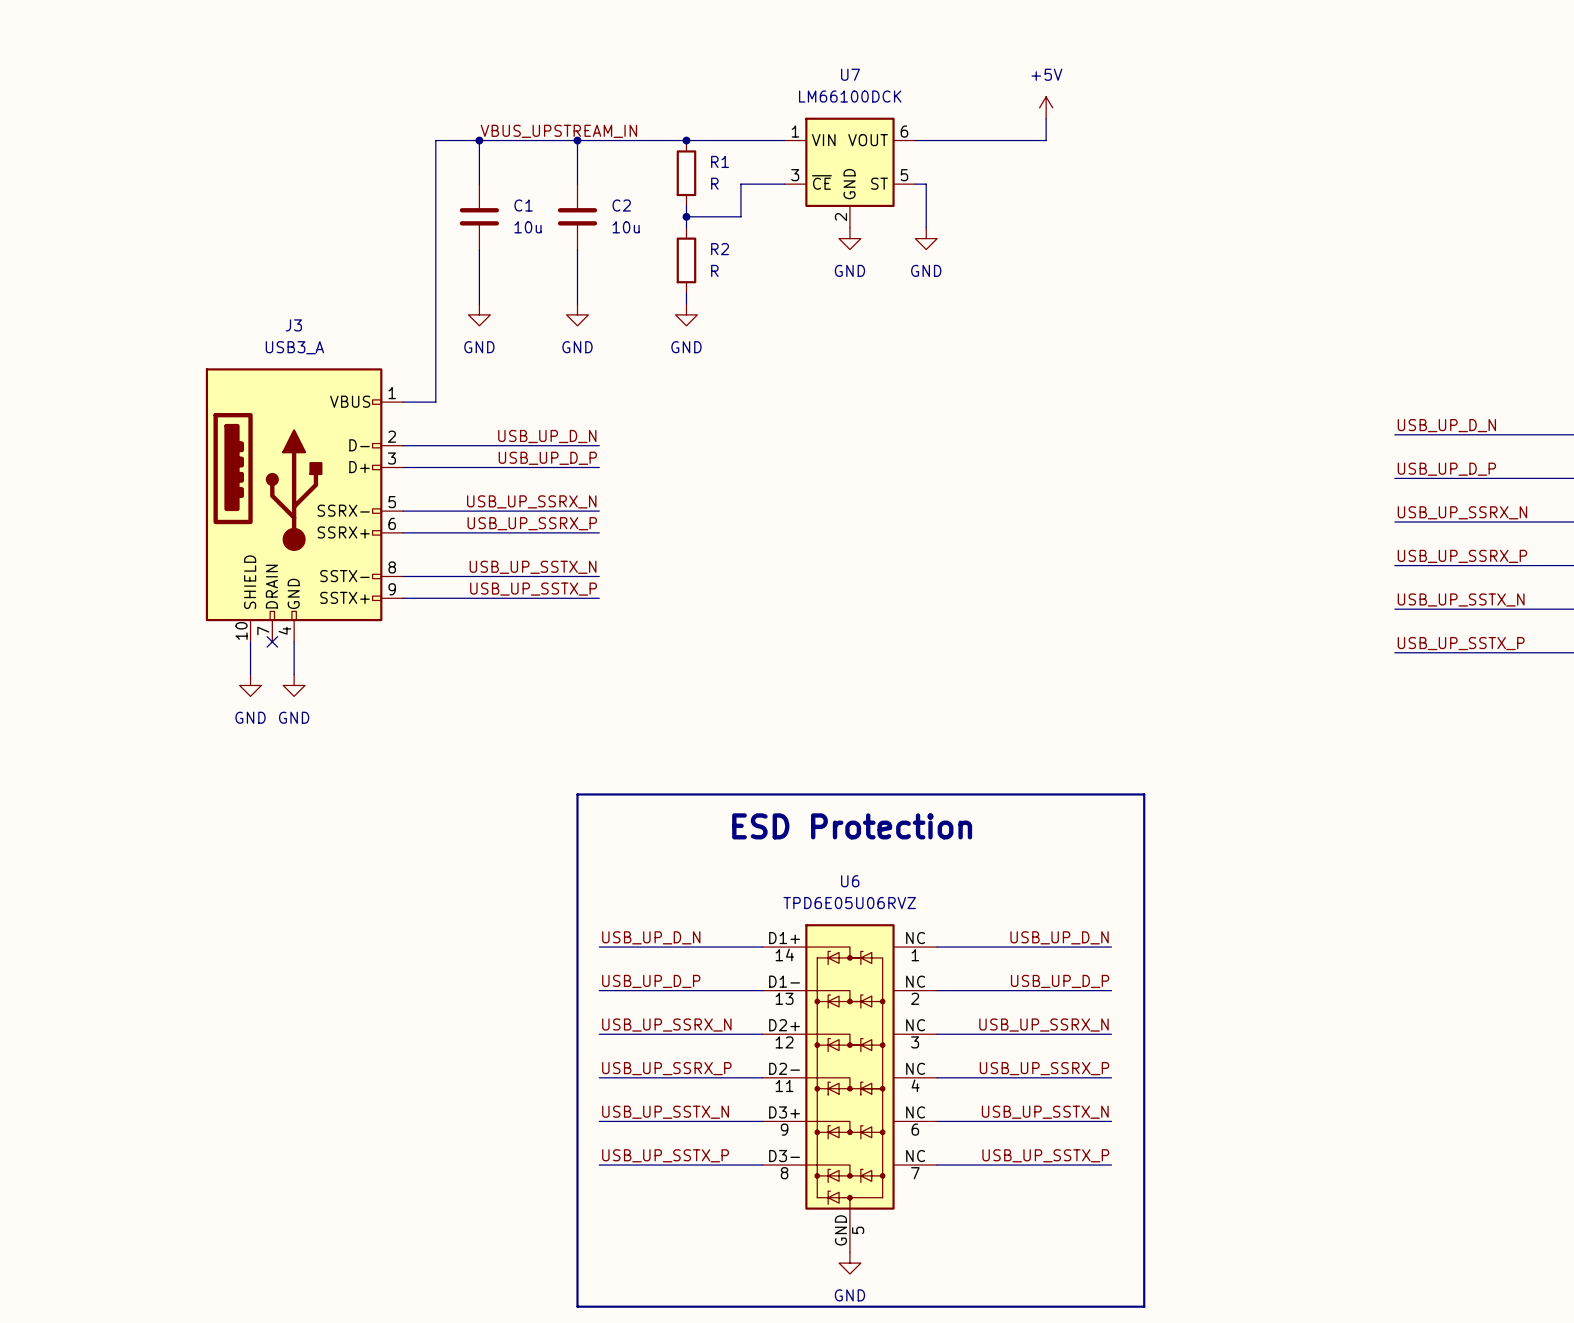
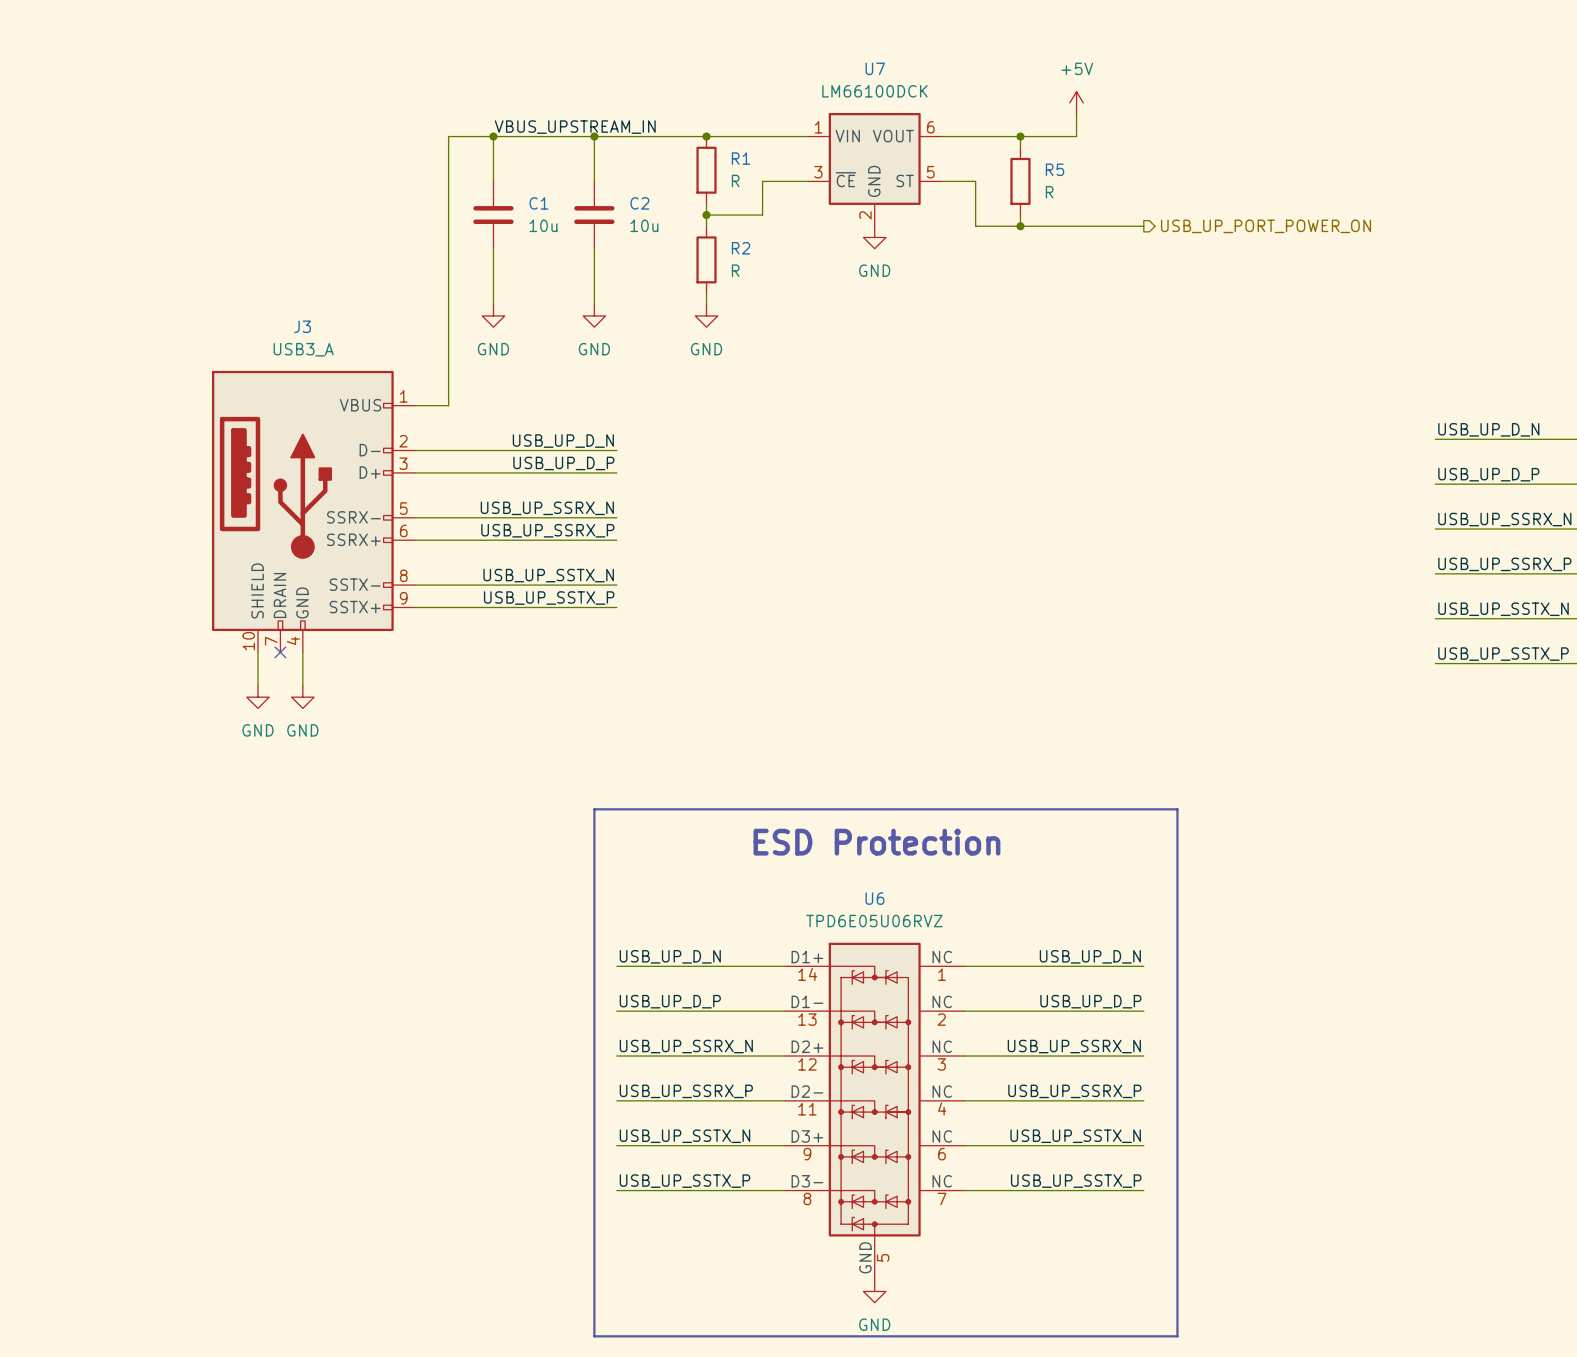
wire: none -> (1020, 136) (1020, 147)
junction: none -> (1020, 136)
wire: (926, 184) (926, 227) -> (953, 181) (975, 181) (975, 226) (1143, 226)
R5: none -> R (1020, 181)
wire: none -> (1020, 215) (1020, 226)
junction: none -> (1020, 226)
hierarchical label: none -> USB_UP_PORT_POWER_ON (1265, 226)
power symbol: GND (926, 238) -> none

